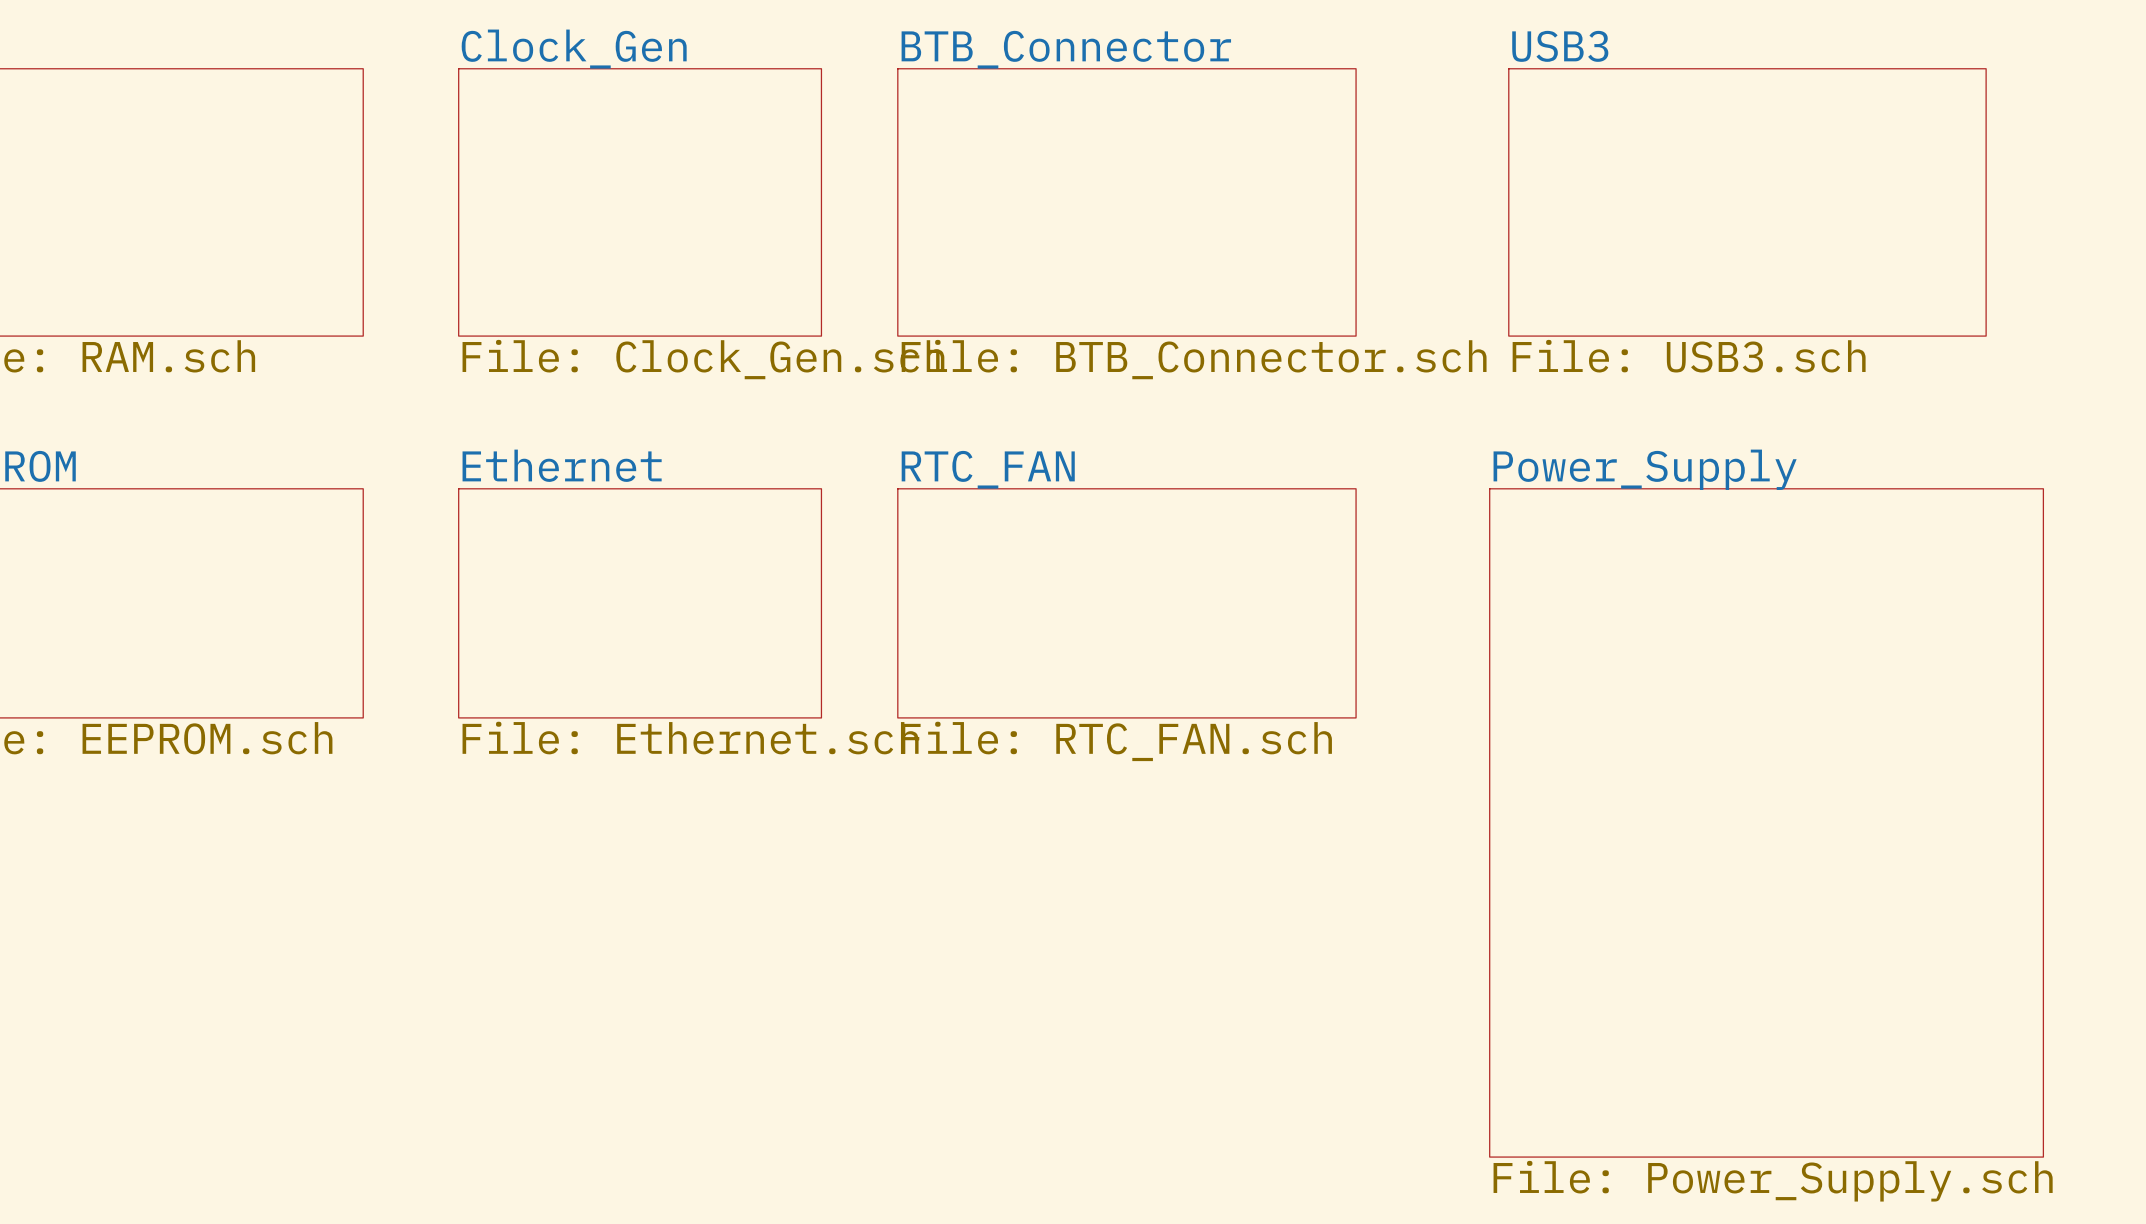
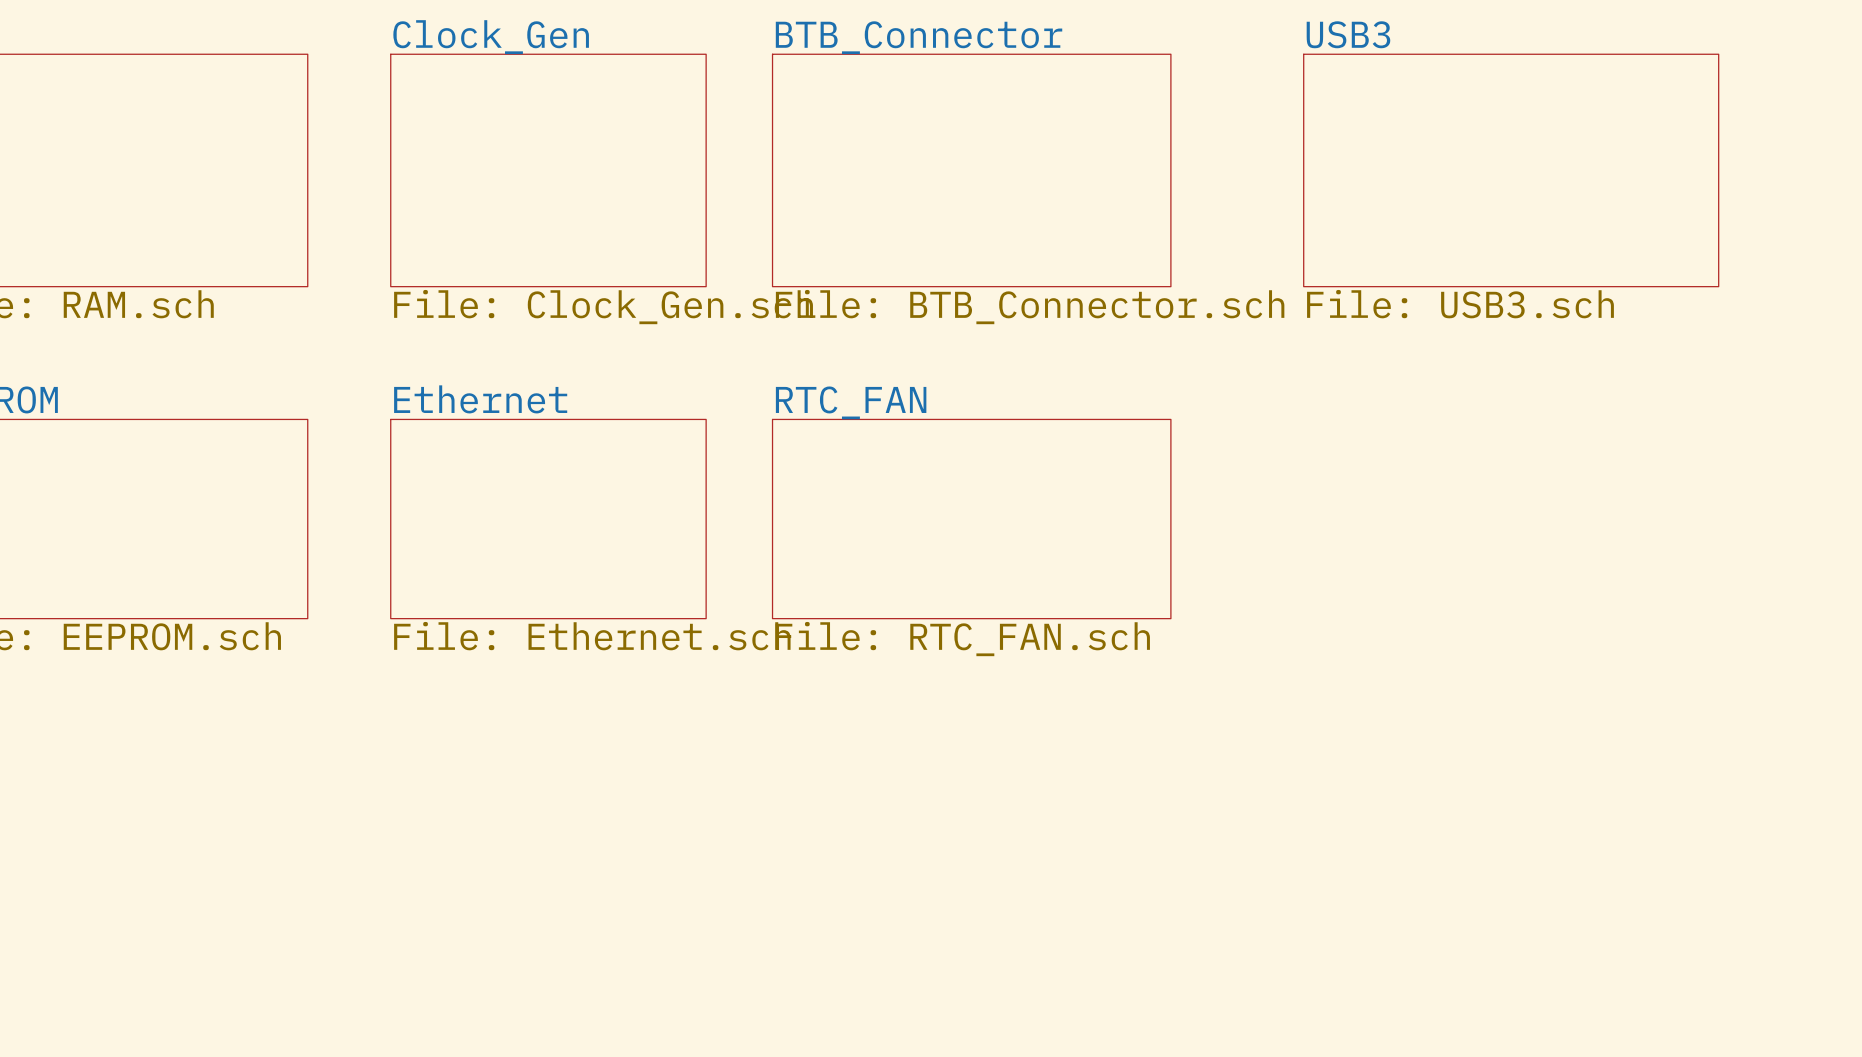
sheet Power_Supply: File: Power_Supply.sch (1766, 822) -> none

